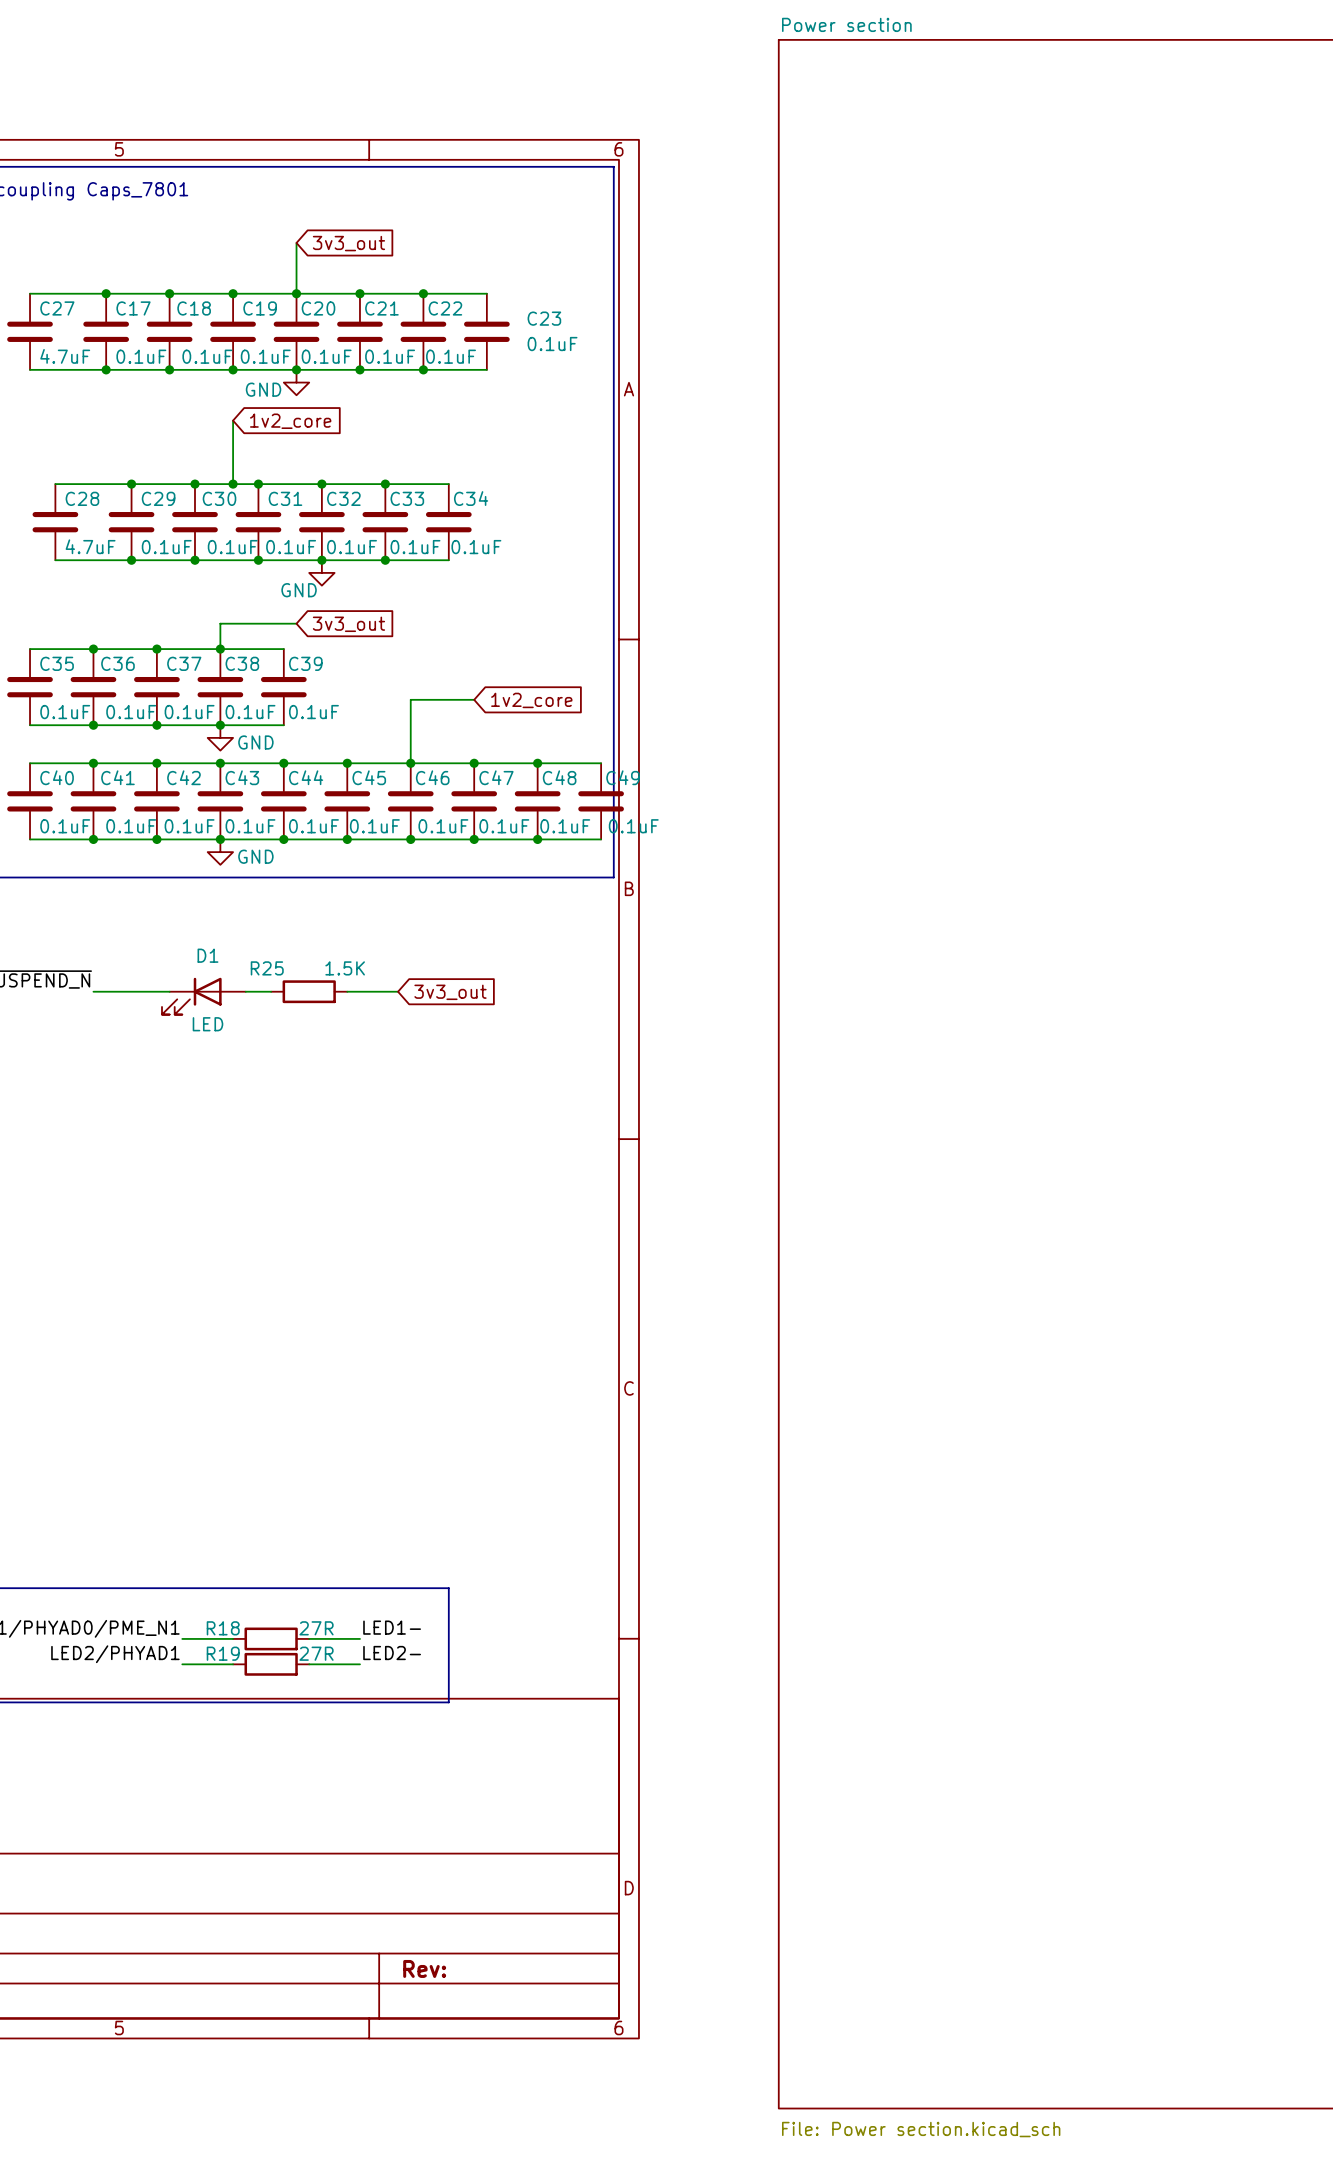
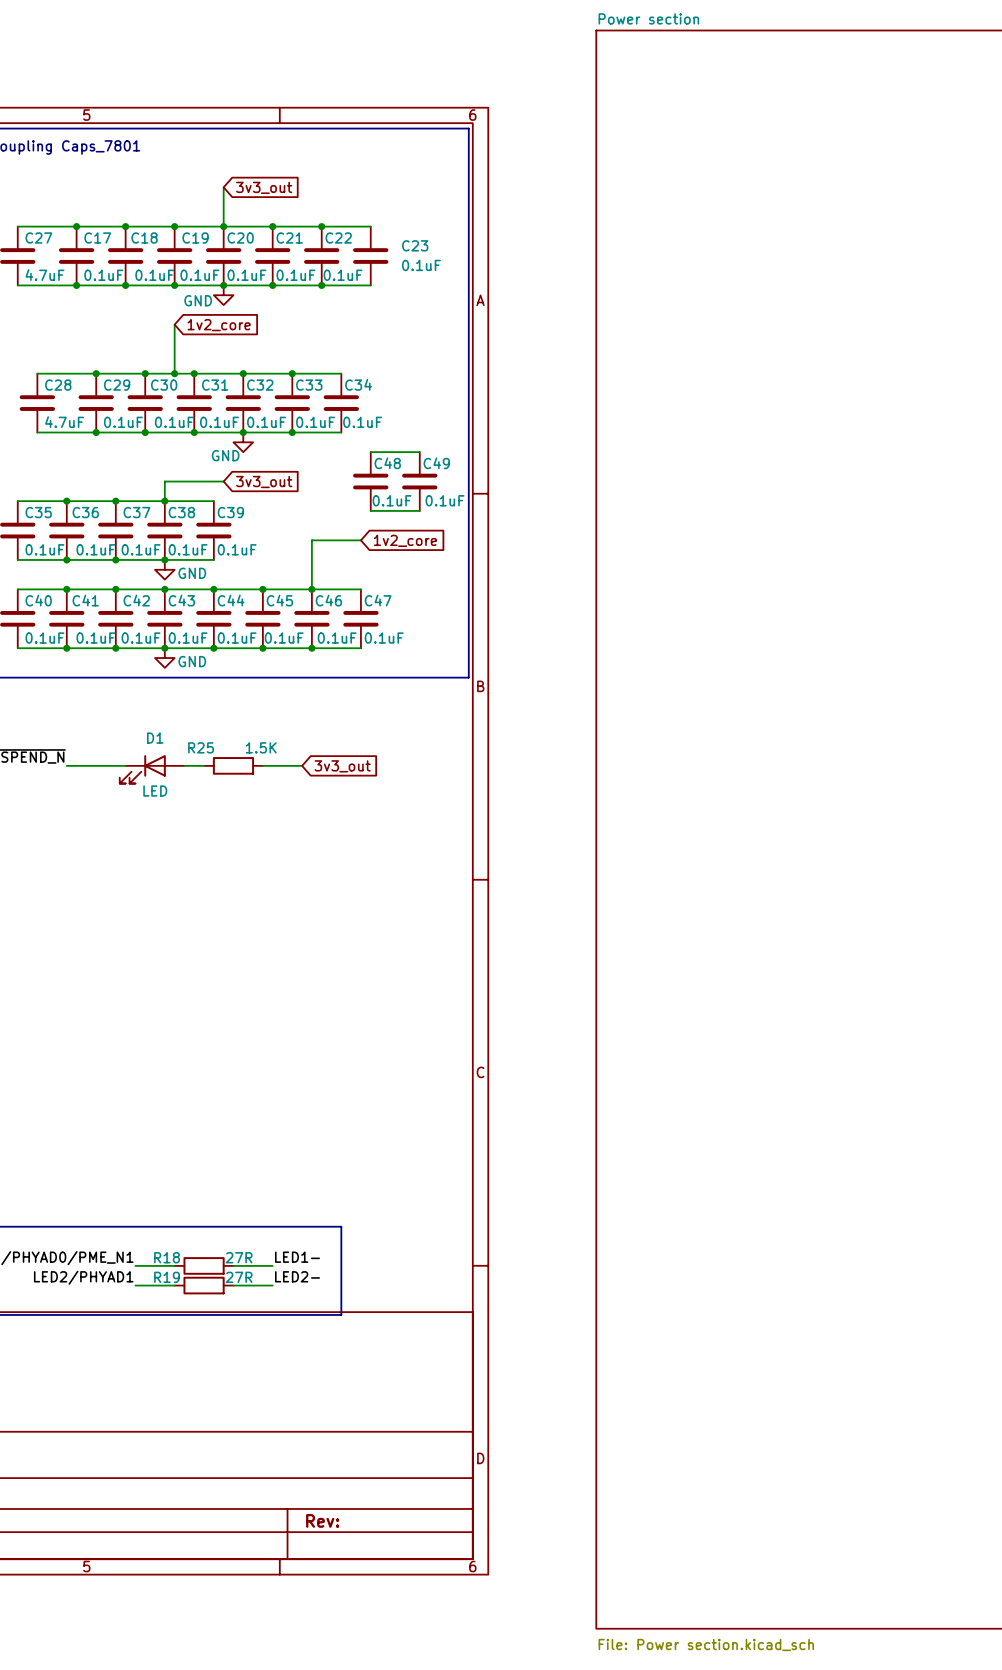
wire: none -> (370, 452) (419, 452)
wire: none -> (370, 510) (419, 510)
wire: (474, 763) (601, 763) -> none
junction: (474, 763) -> none
junction: (537, 763) -> none
C48 position: (537, 801) -> (370, 481)
C49 position: (601, 801) -> (419, 481)
wire: (474, 839) (601, 839) -> none
junction: (474, 839) -> none
junction: (537, 839) -> none

